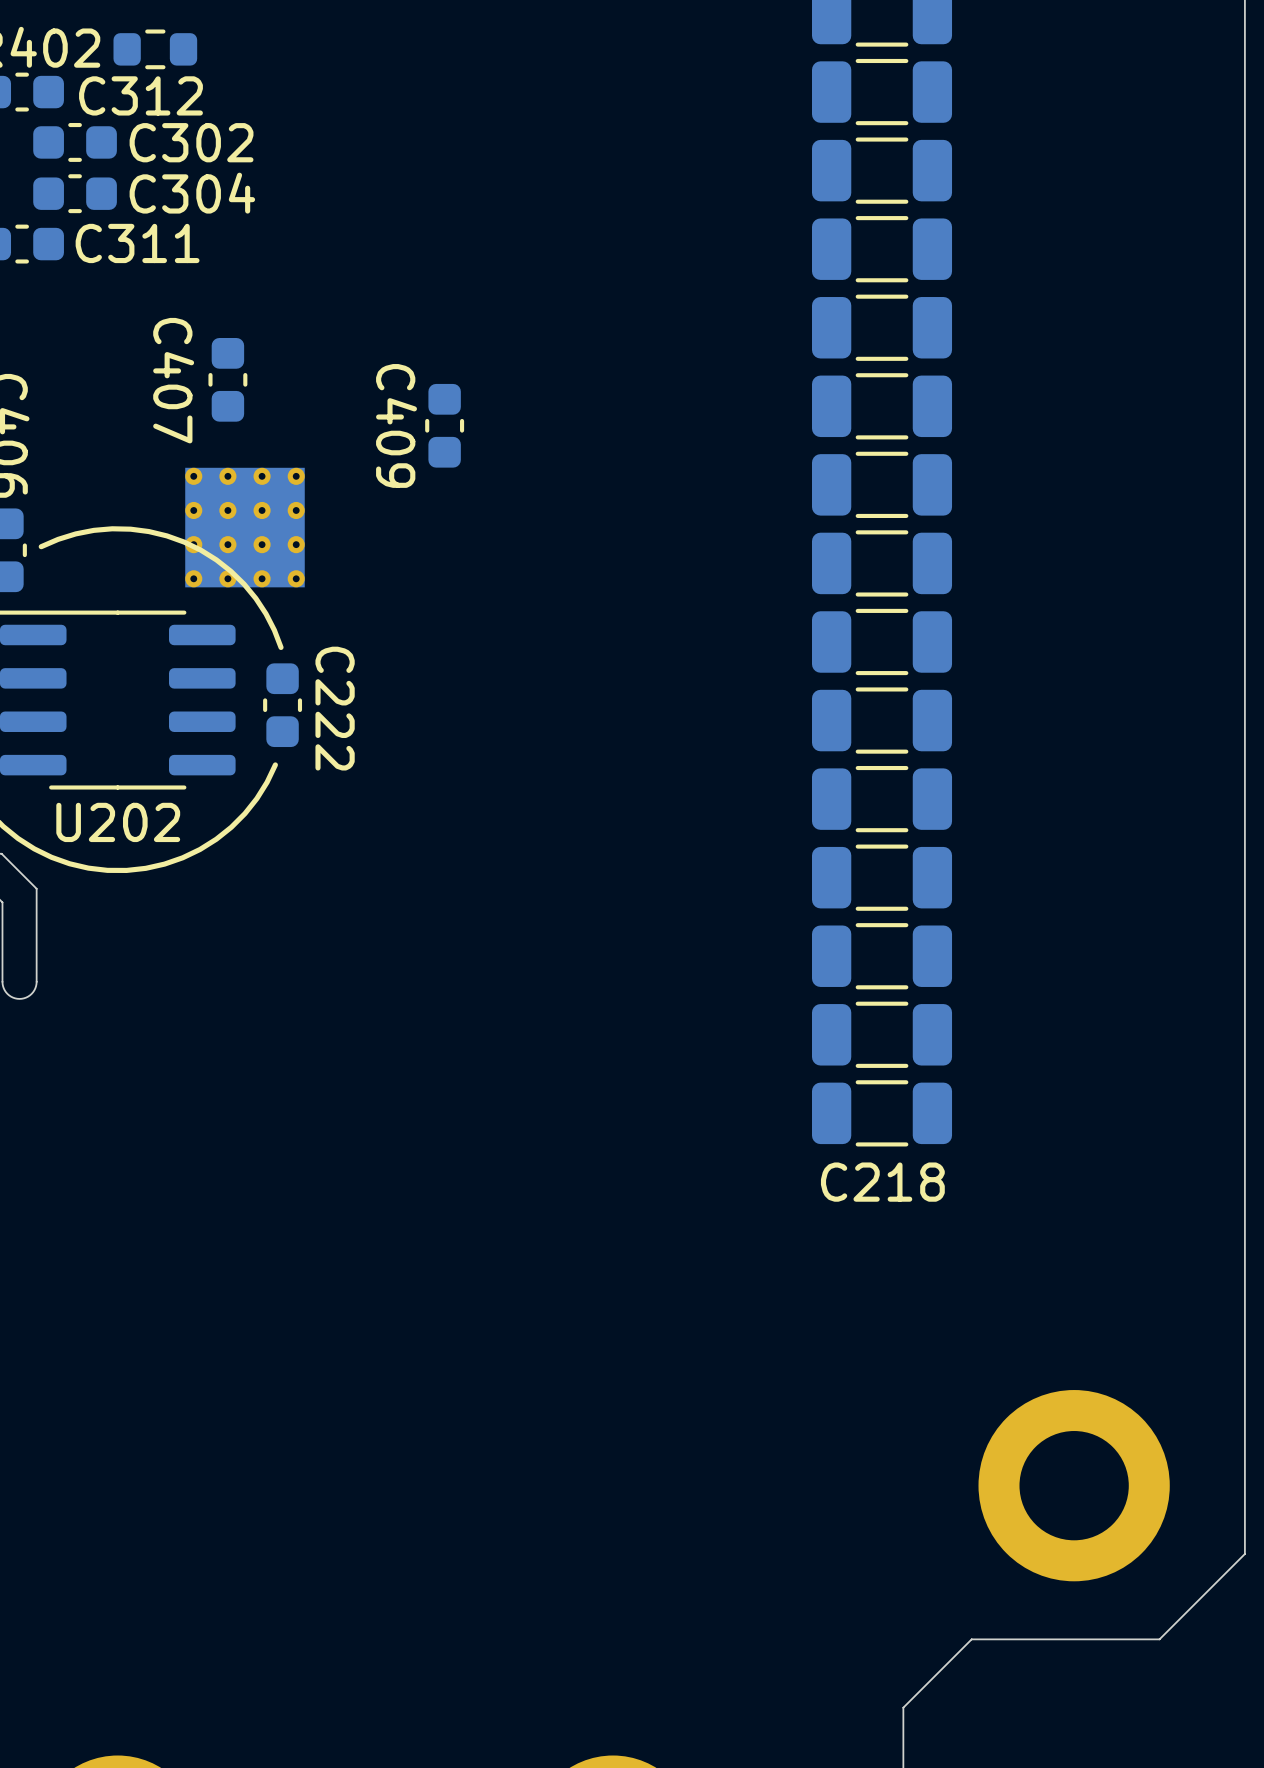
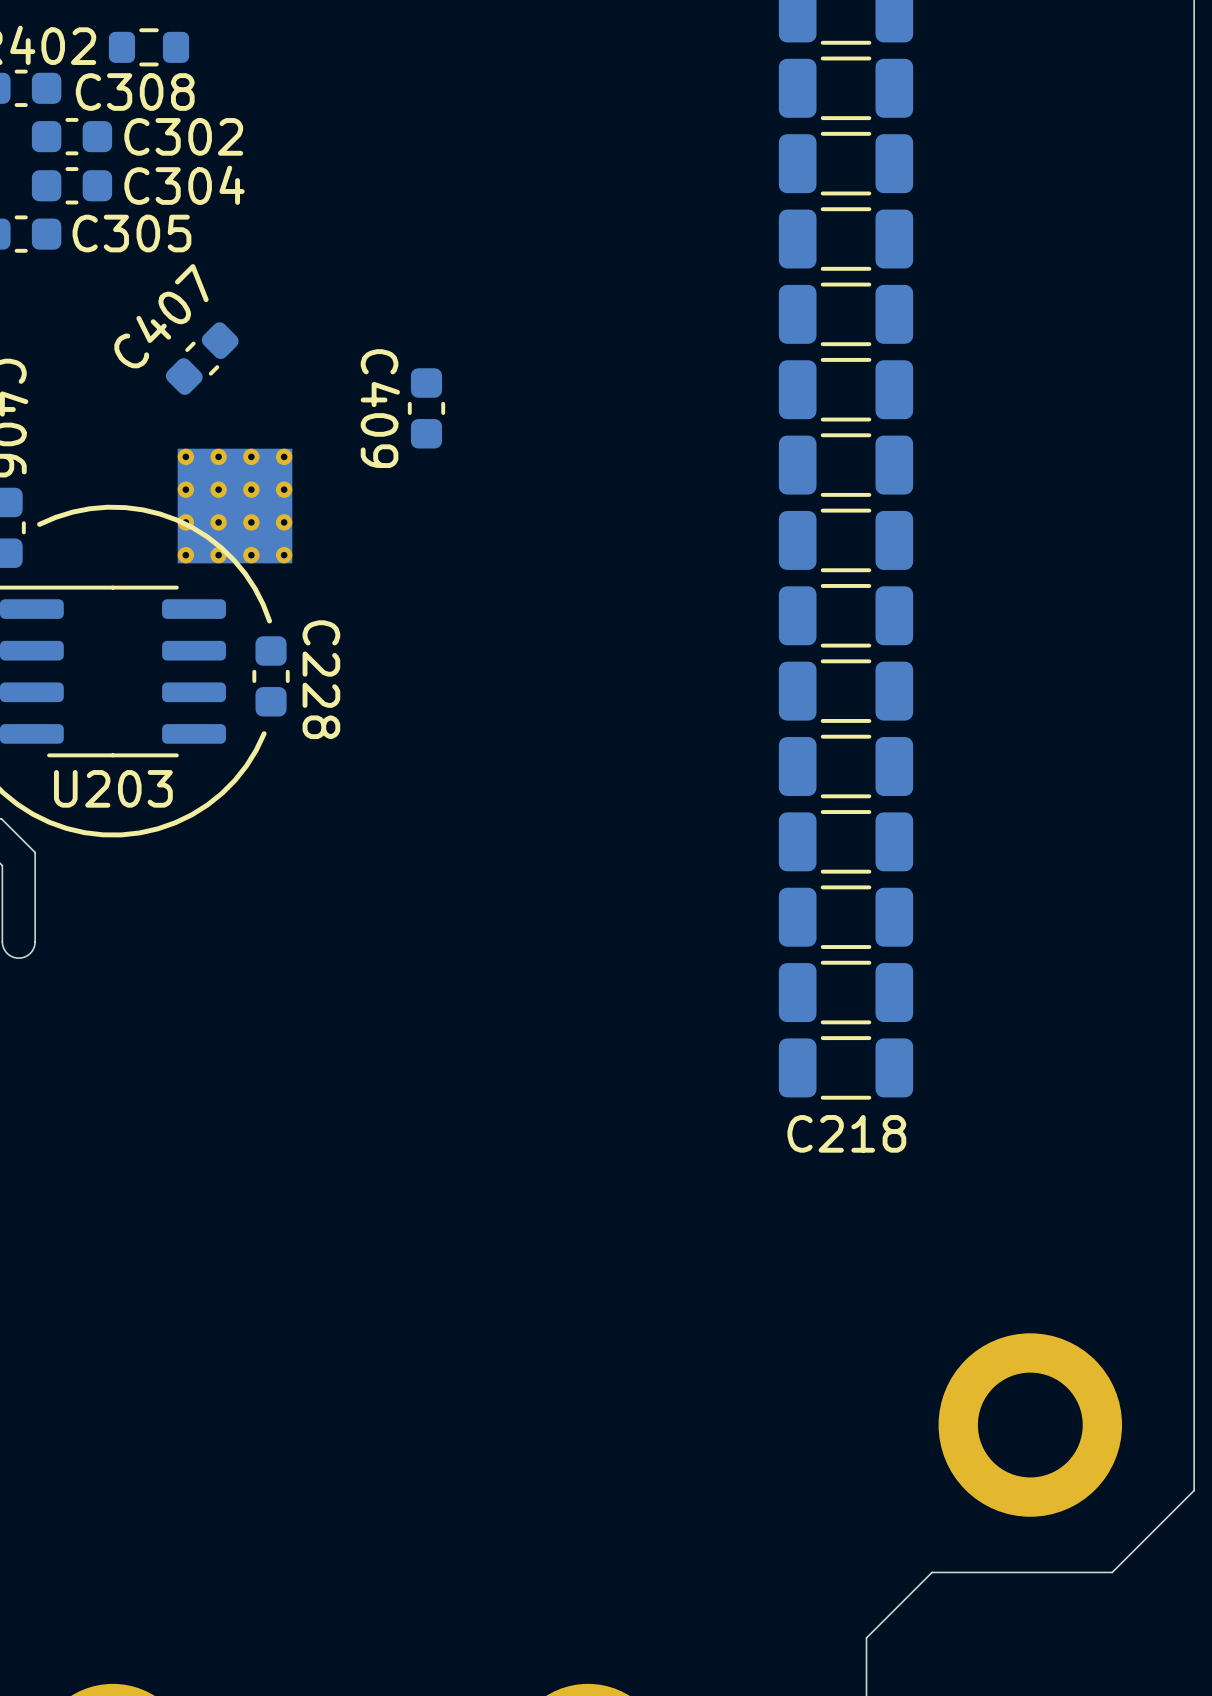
C312 name: C312 (140, 95) -> C308 (135, 92)
C311 name: C311 (137, 243) -> C305 (131, 233)
C407 rotation: 0° (227, 379) -> 45° clockwise (202, 358)
C222 name: C222 (335, 708) -> C228 (321, 679)
U202 name: U202 (118, 822) -> U203 (113, 788)

